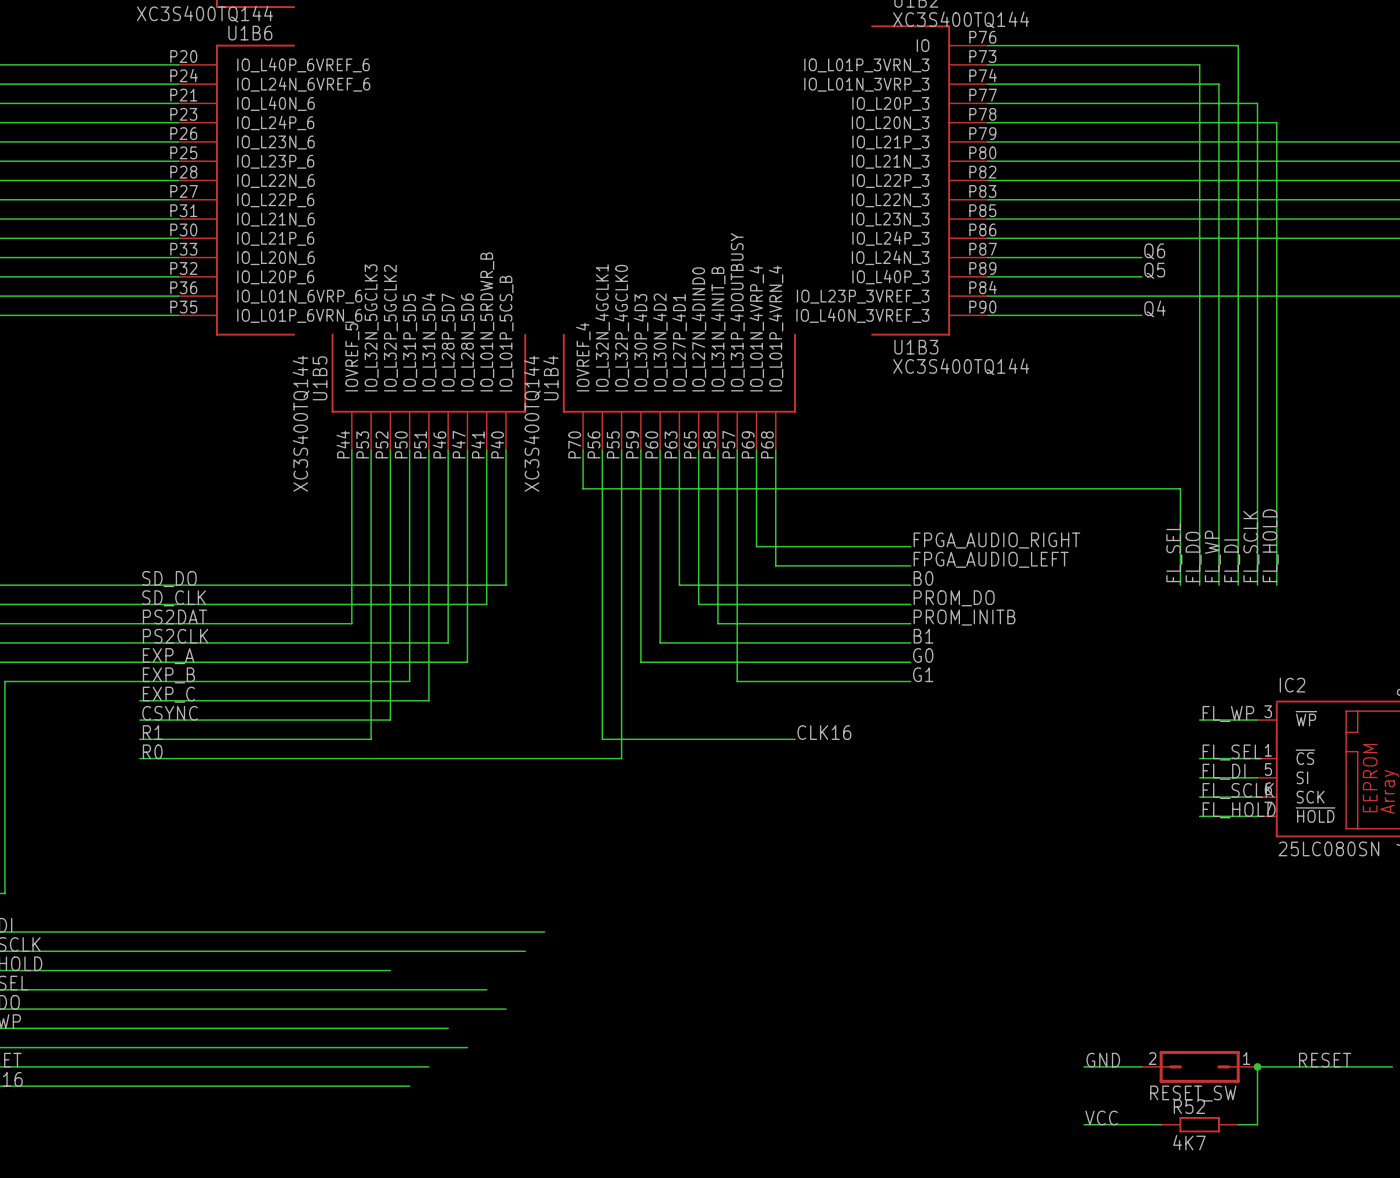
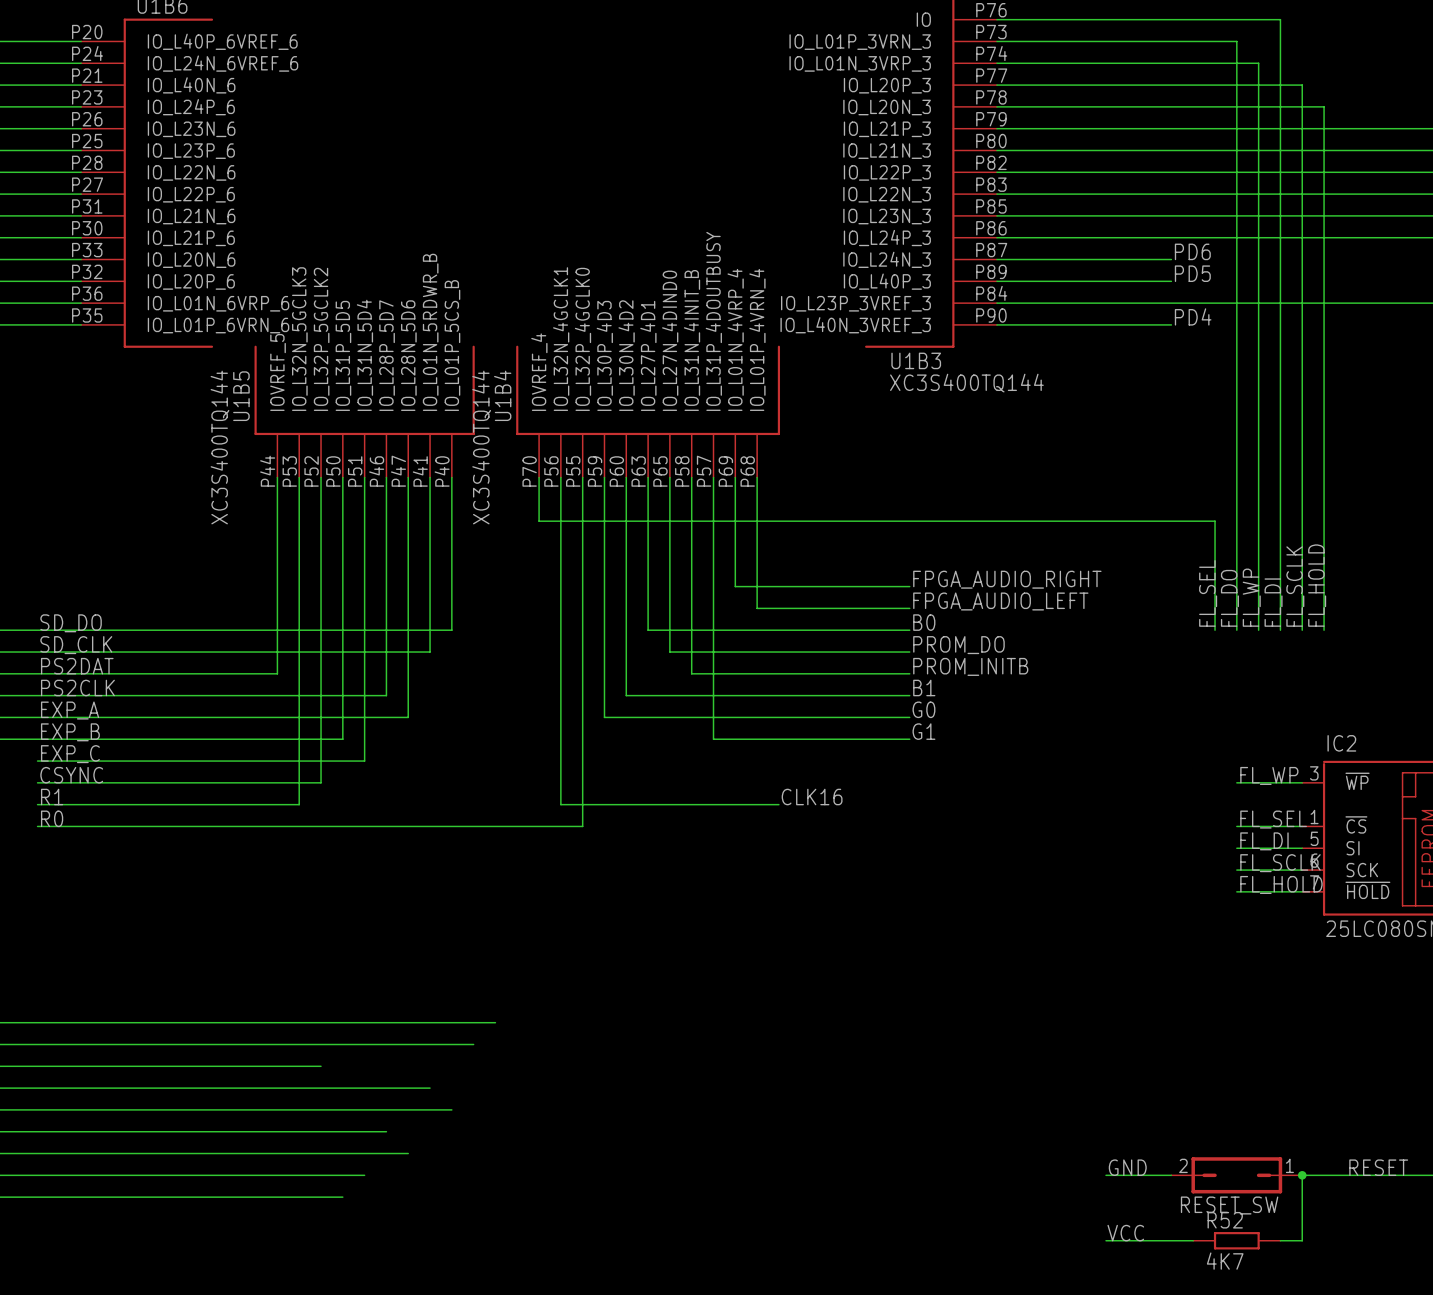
label: Q6 (1154, 251) -> PD6 (1192, 251)
label: Q5 (1154, 270) -> PD5 (1192, 273)
label: Q4 (1155, 308) -> PD4 (1193, 316)

